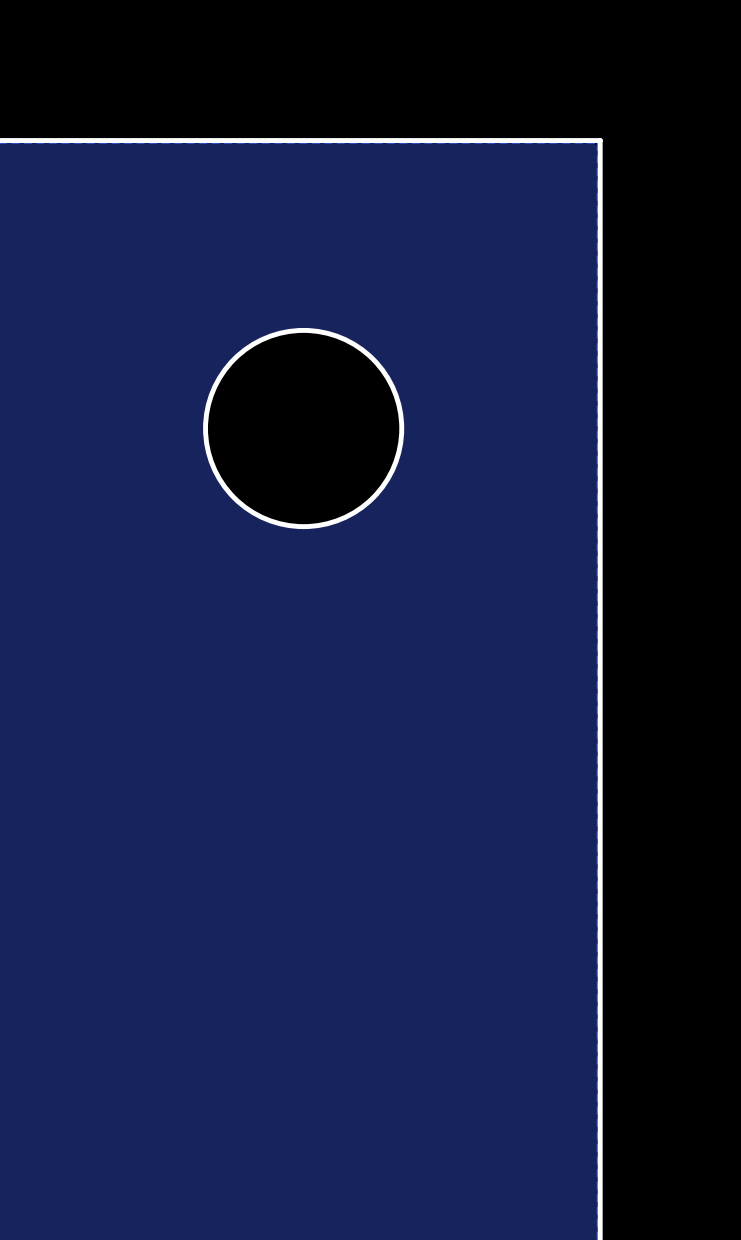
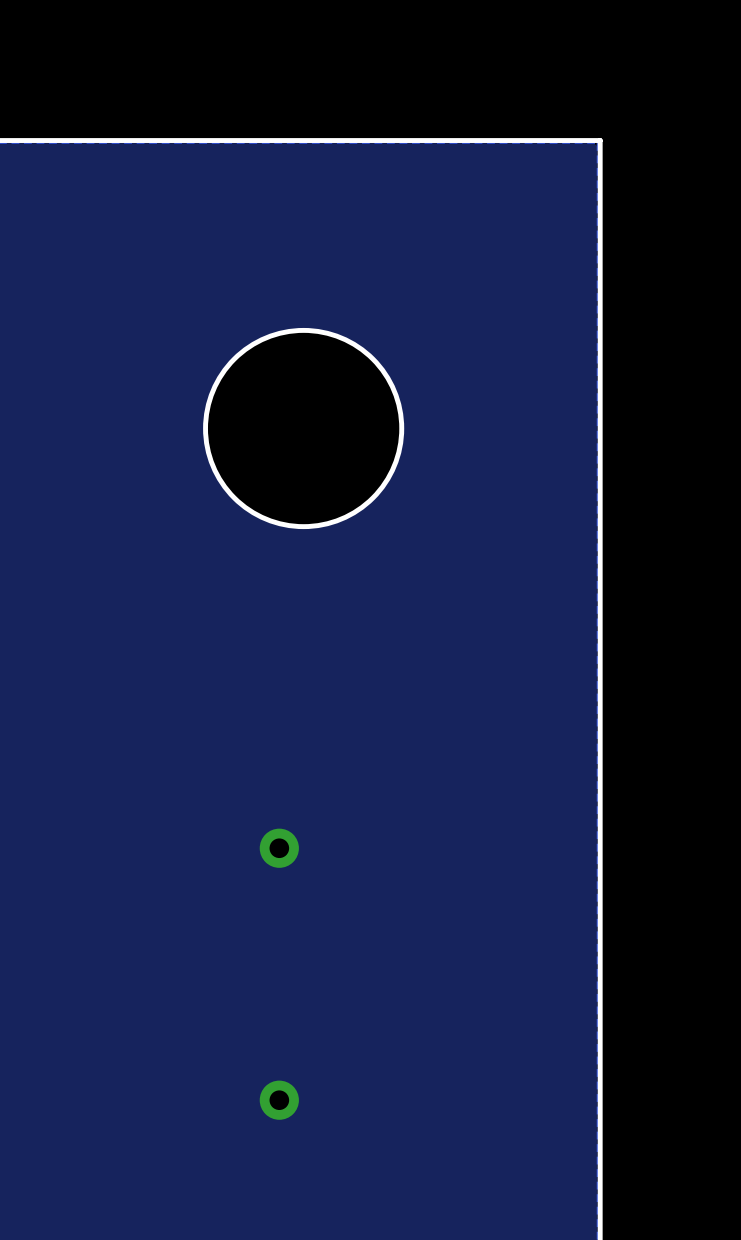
via: none -> (279, 848)
via: none -> (279, 1100)

